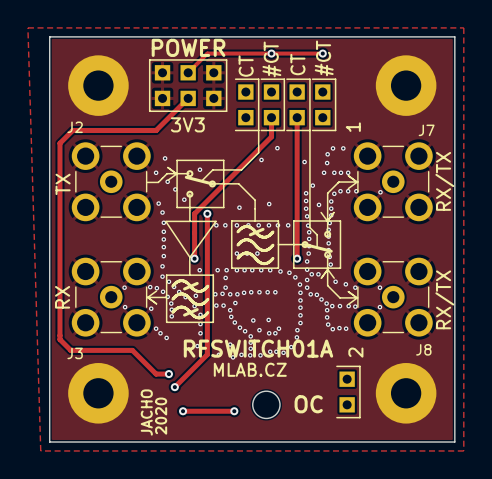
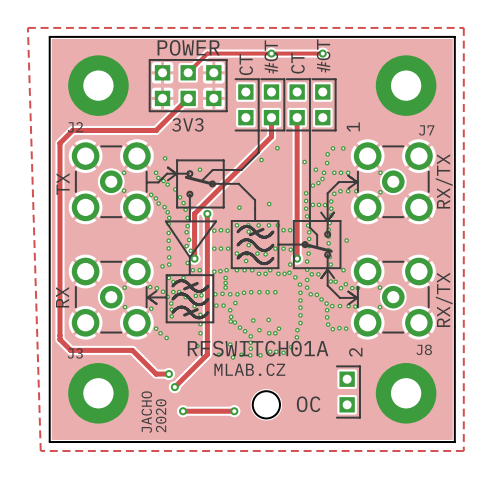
via: none -> (315, 169)
via: none -> (124, 172)
via: none -> (380, 172)
via: none -> (158, 177)
via: none -> (322, 178)
via: none -> (163, 180)
via: (167, 181) -> none
via: none -> (318, 183)
via: none -> (167, 184)
via: none -> (124, 190)
via: none -> (151, 194)
via: none -> (179, 197)
via: none -> (155, 198)
via: (184, 199) -> none
via: none -> (183, 203)
via: none -> (312, 204)
via: none -> (325, 205)
via: none -> (164, 207)
via: none -> (185, 209)
via: (162, 212) -> none
via: none -> (167, 212)
via: none -> (169, 217)
via: none -> (187, 217)
via: (163, 222) -> none
via: none -> (168, 224)
via: (216, 225) -> none
via: (225, 225) -> none
via: (288, 225) -> none
via: none -> (187, 226)
via: none -> (214, 230)
via: none -> (220, 230)
via: none -> (227, 230)
via: none -> (283, 230)
via: none -> (290, 230)
via: (163, 231) -> none
via: none -> (248, 231)
via: none -> (186, 232)
via: none -> (168, 233)
via: (163, 239) -> none
via: none -> (189, 239)
via: none -> (168, 240)
via: none -> (346, 240)
via: none -> (248, 245)
via: none -> (186, 246)
via: (163, 247) -> none
via: none -> (168, 248)
via: none -> (214, 248)
via: none -> (220, 248)
via: none -> (228, 248)
via: none -> (275, 248)
via: none -> (283, 248)
via: none -> (290, 249)
via: none -> (190, 250)
via: none -> (265, 254)
via: (163, 256) -> none
via: none -> (169, 257)
via: none -> (246, 260)
via: none -> (187, 263)
via: none -> (169, 264)
via: none -> (290, 264)
via: none -> (192, 270)
via: (217, 270) -> none
via: (261, 270) -> none
via: none -> (343, 270)
via: none -> (214, 271)
via: none -> (220, 271)
via: (280, 271) -> none
via: none -> (258, 273)
via: none -> (265, 273)
via: none -> (278, 273)
via: none -> (284, 273)
via: (162, 276) -> none
via: none -> (168, 277)
via: none -> (183, 277)
via: (168, 281) -> none
via: none -> (330, 281)
via: none -> (173, 282)
via: none -> (225, 283)
via: (174, 286) -> none
via: (355, 287) -> none
via: none -> (340, 288)
via: none -> (352, 288)
via: none -> (357, 288)
via: none -> (173, 292)
via: none -> (201, 295)
via: none -> (230, 321)

